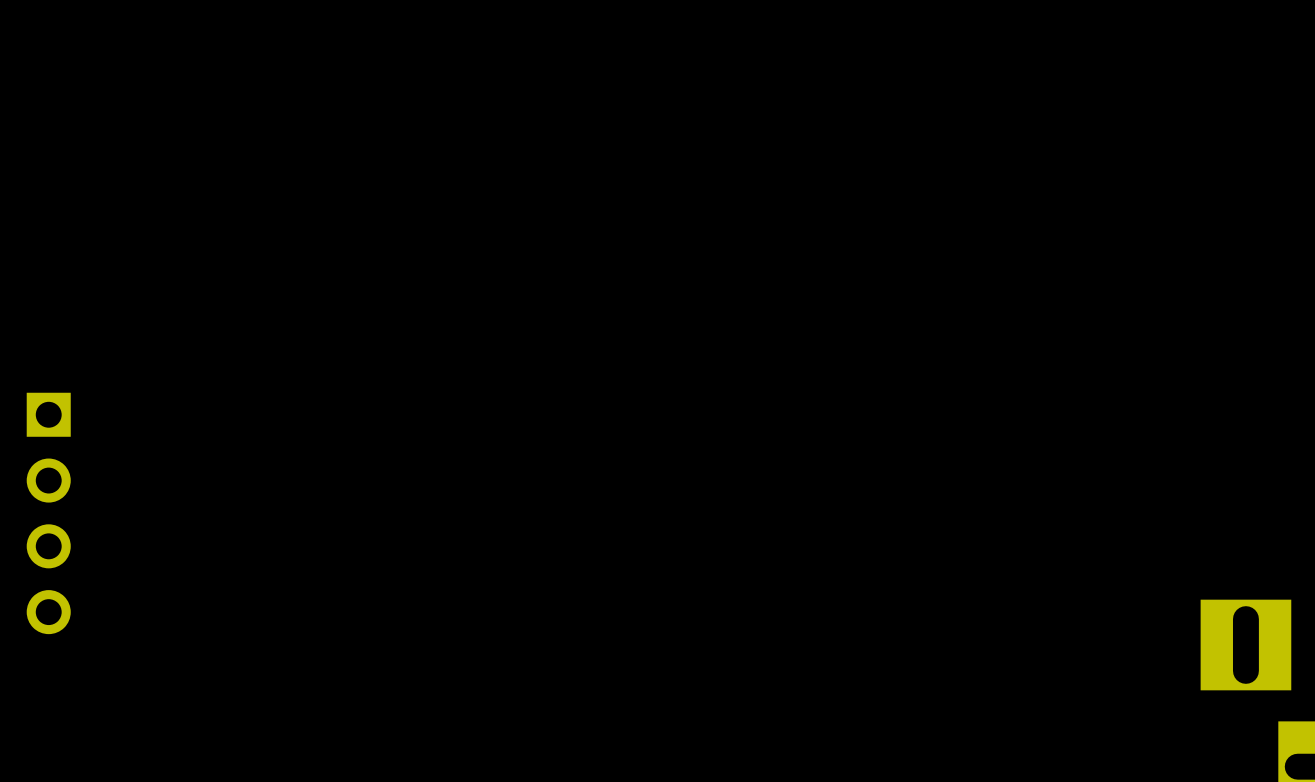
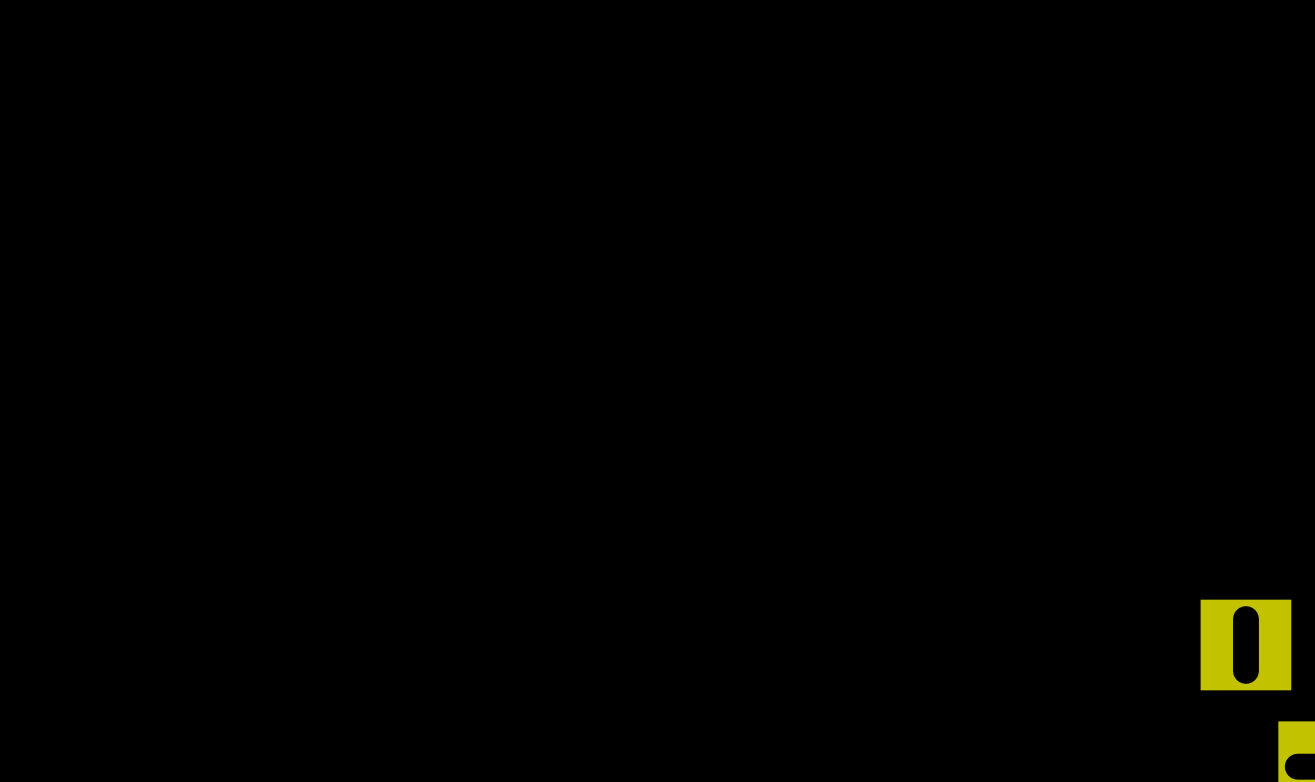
part: (48, 513) -> none

